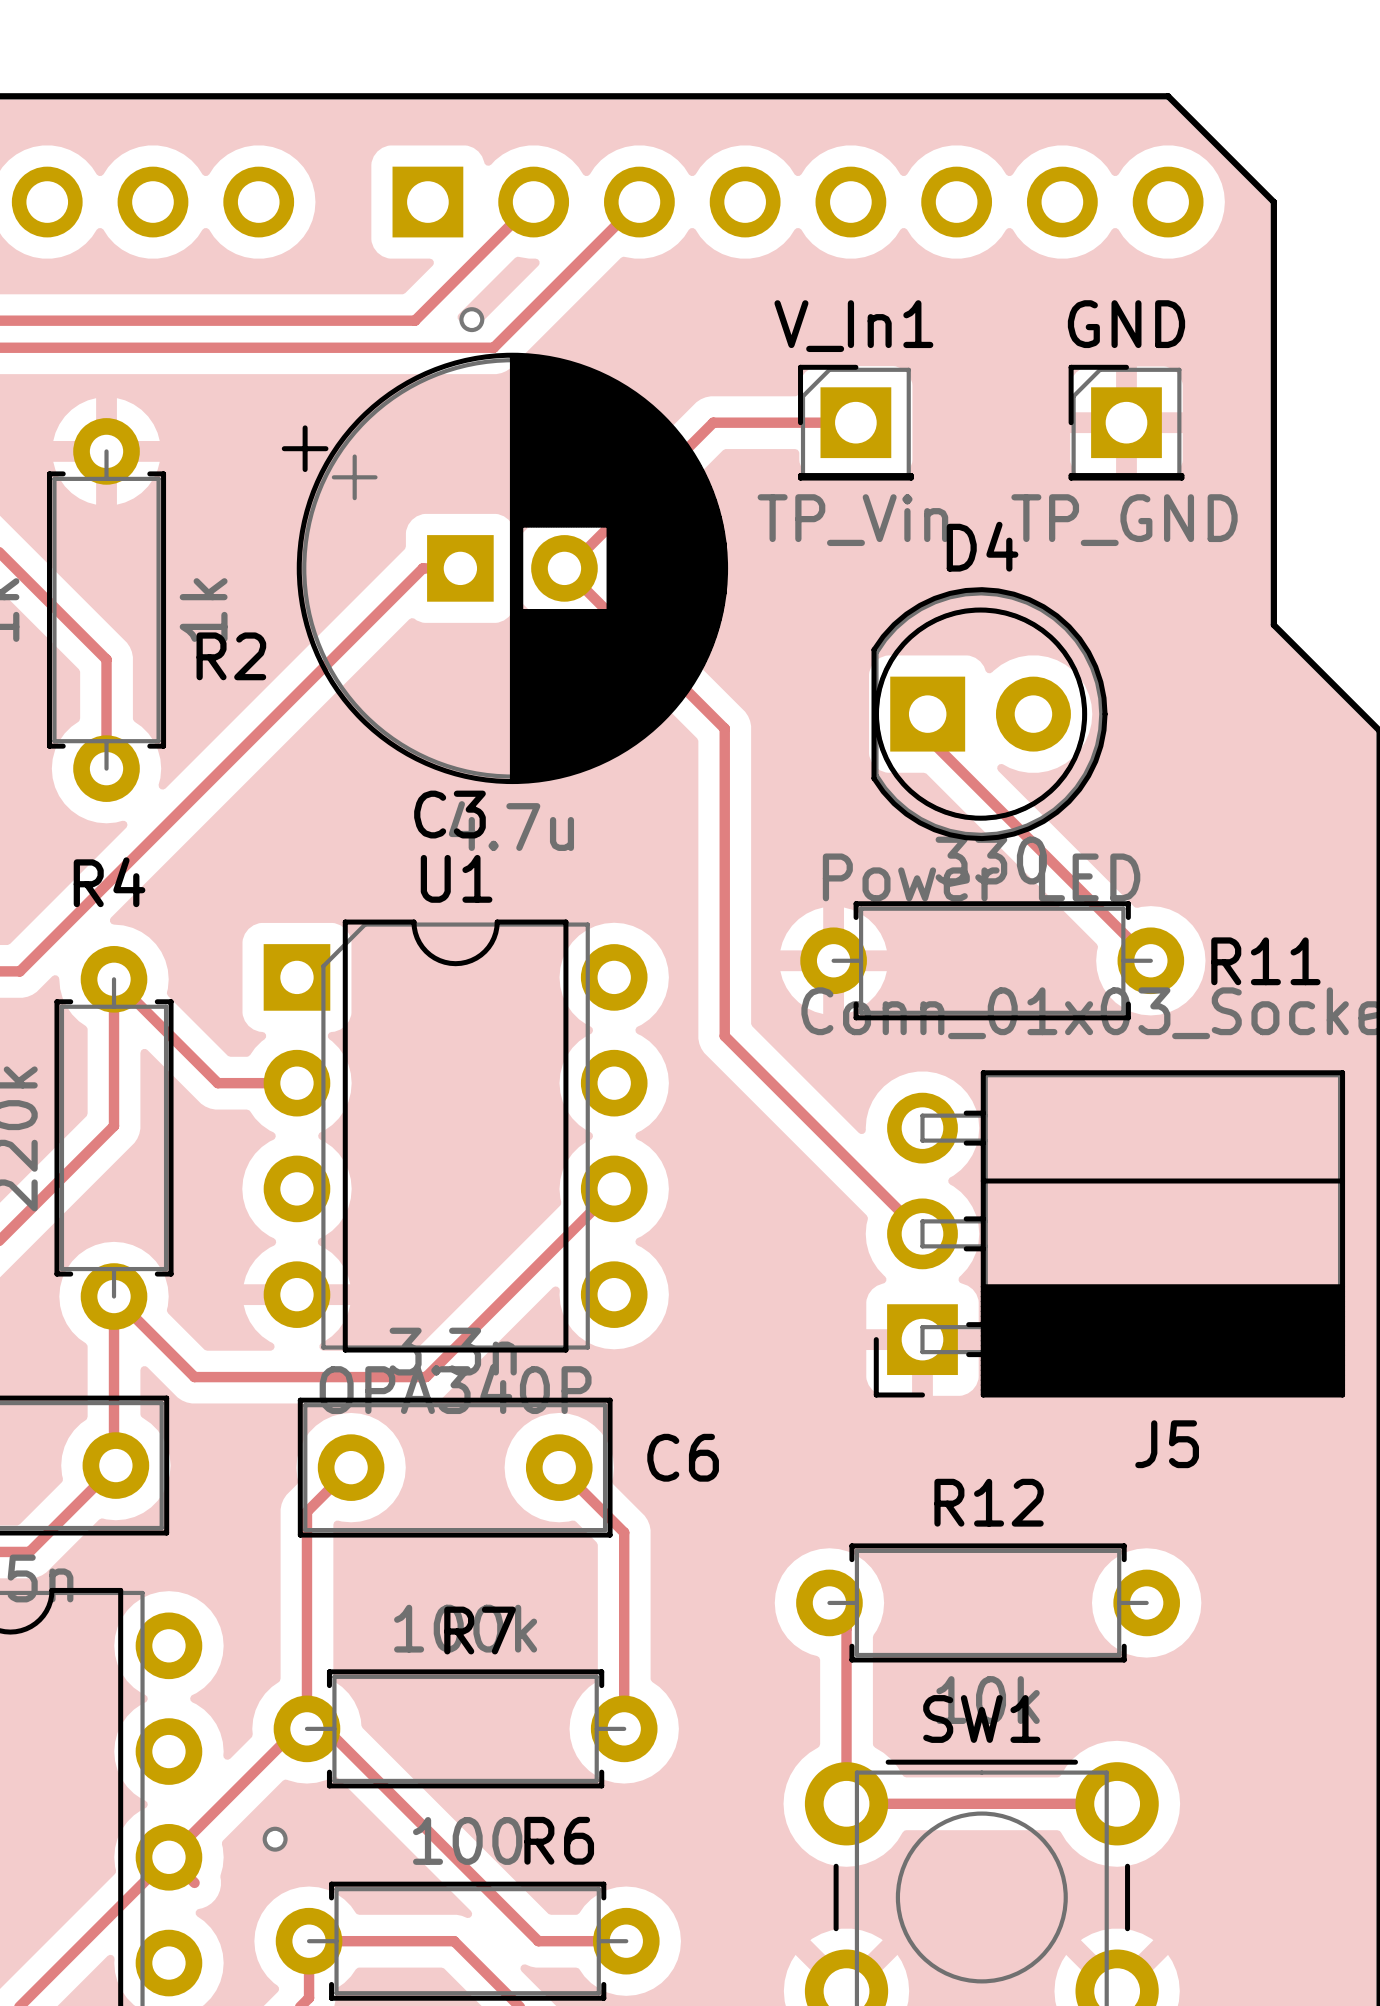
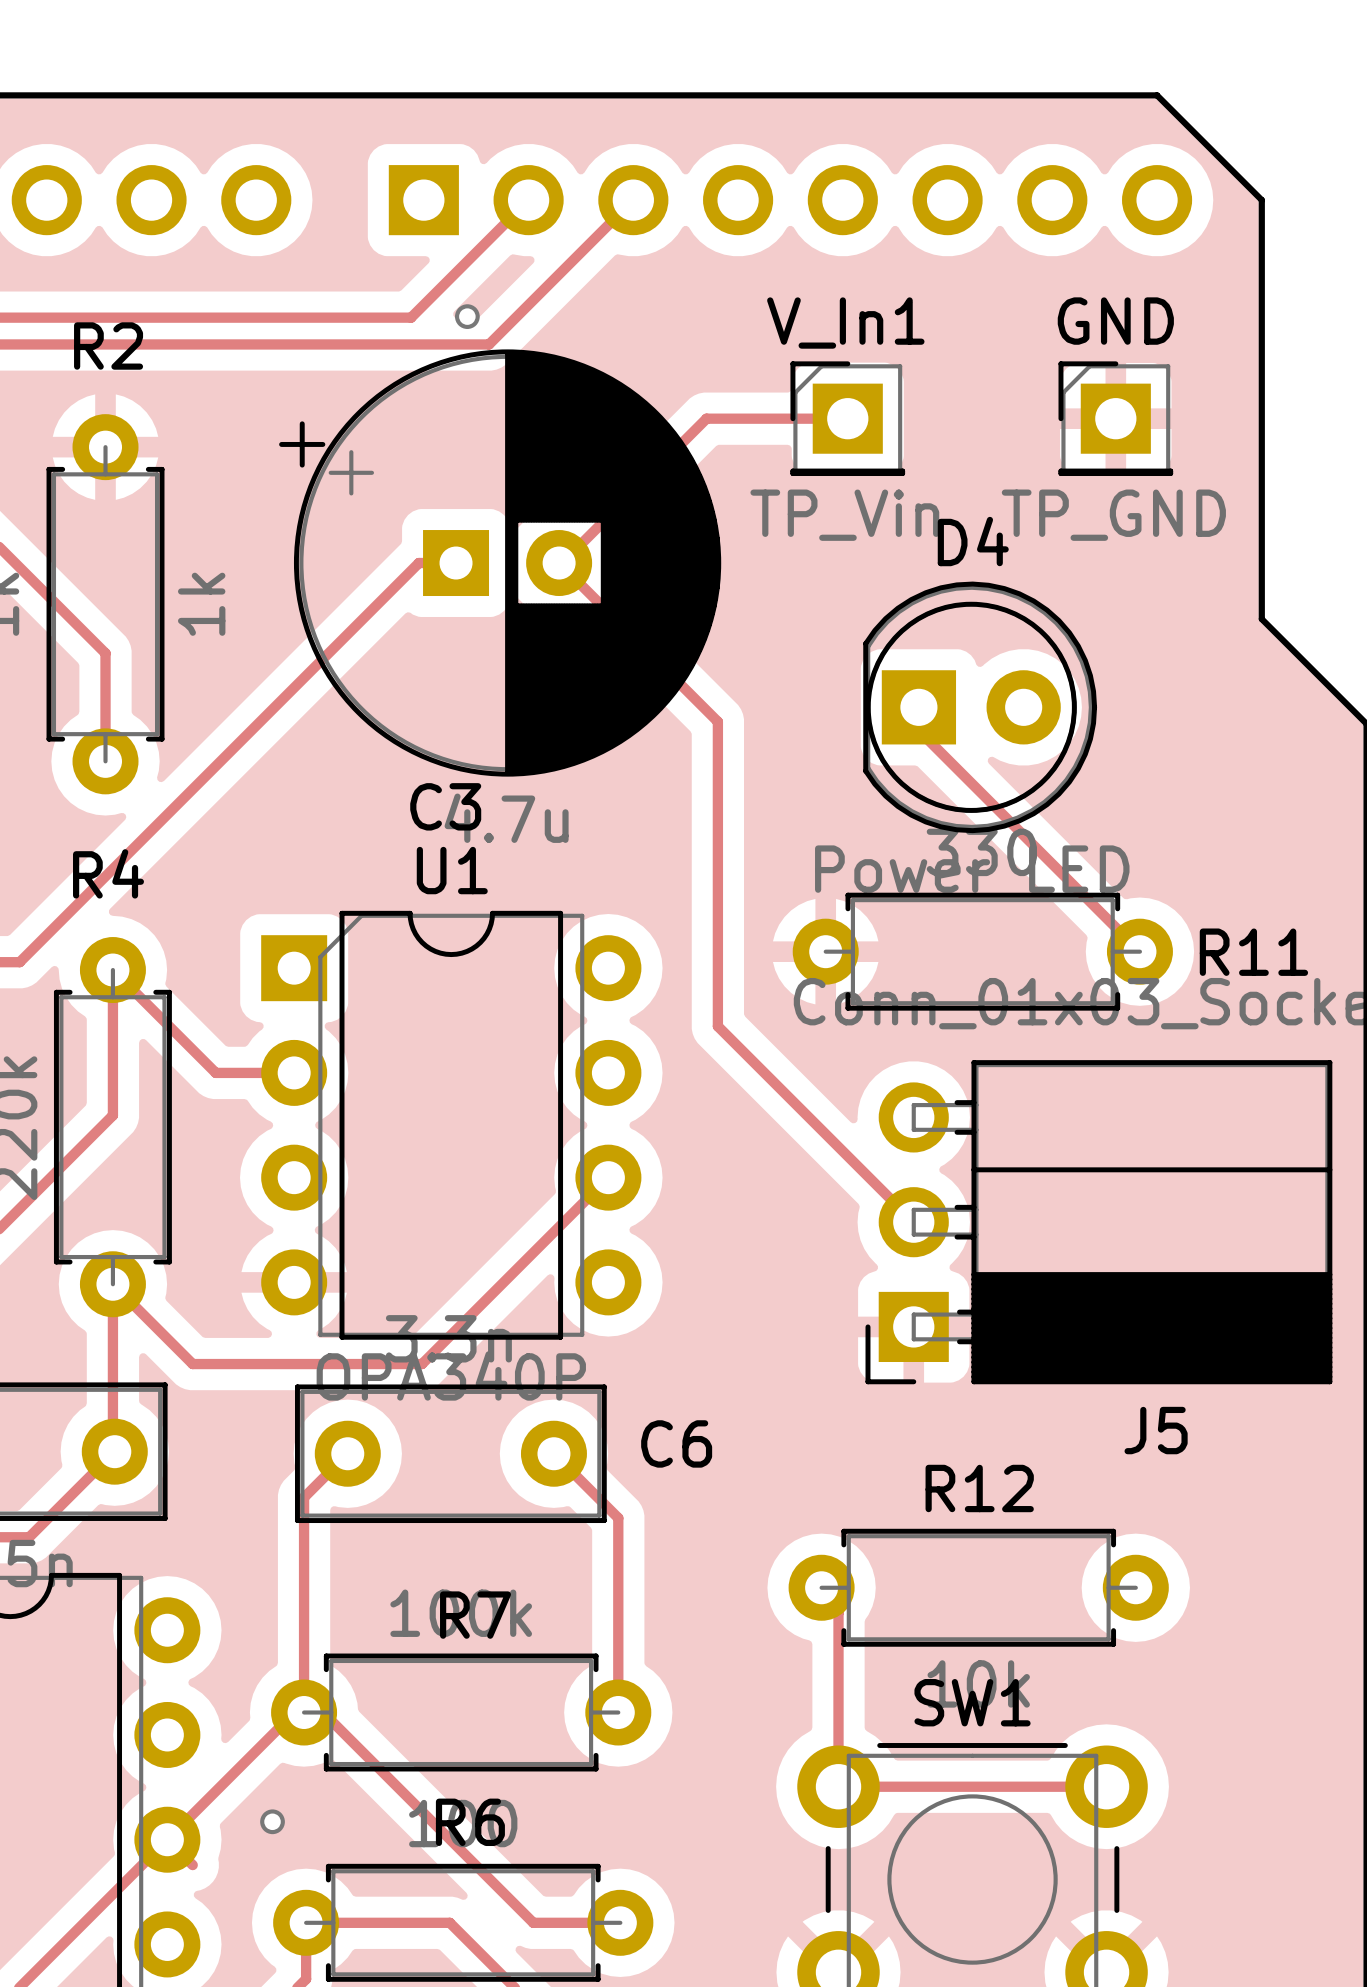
R2 name position: R2 (231, 656) -> R2 (108, 346)
R6 name position: R6 (559, 1840) -> R6 (470, 1822)

